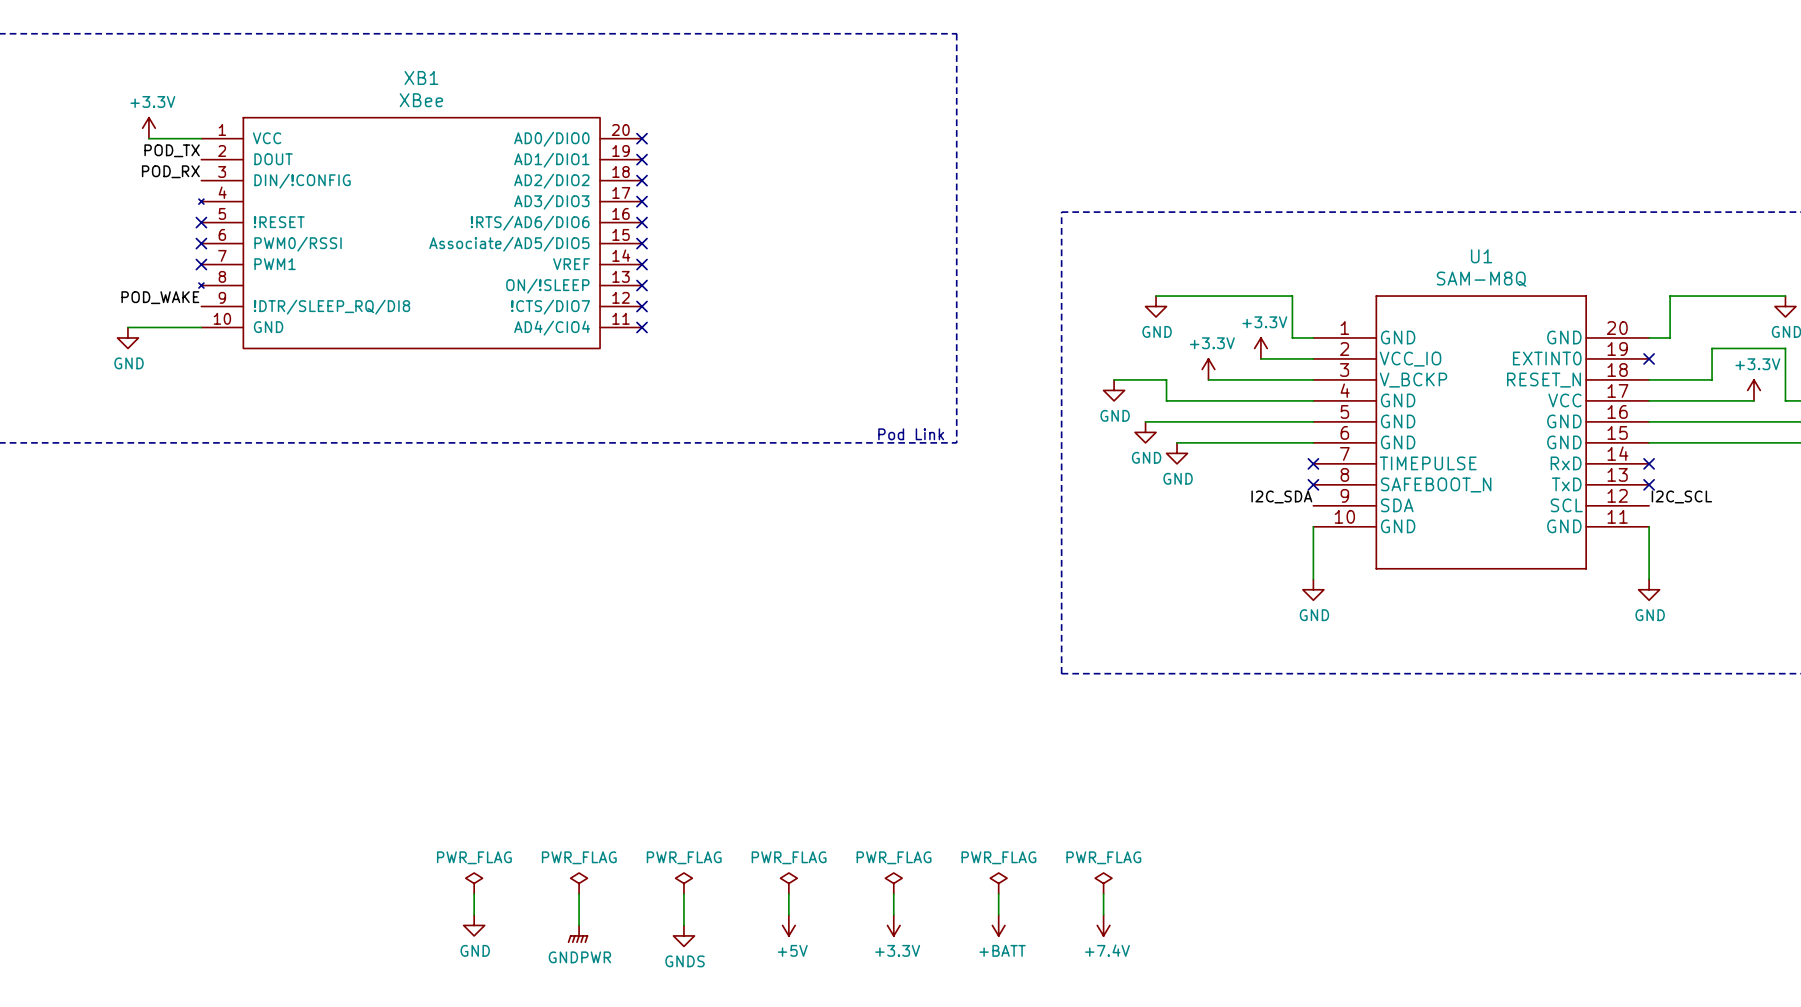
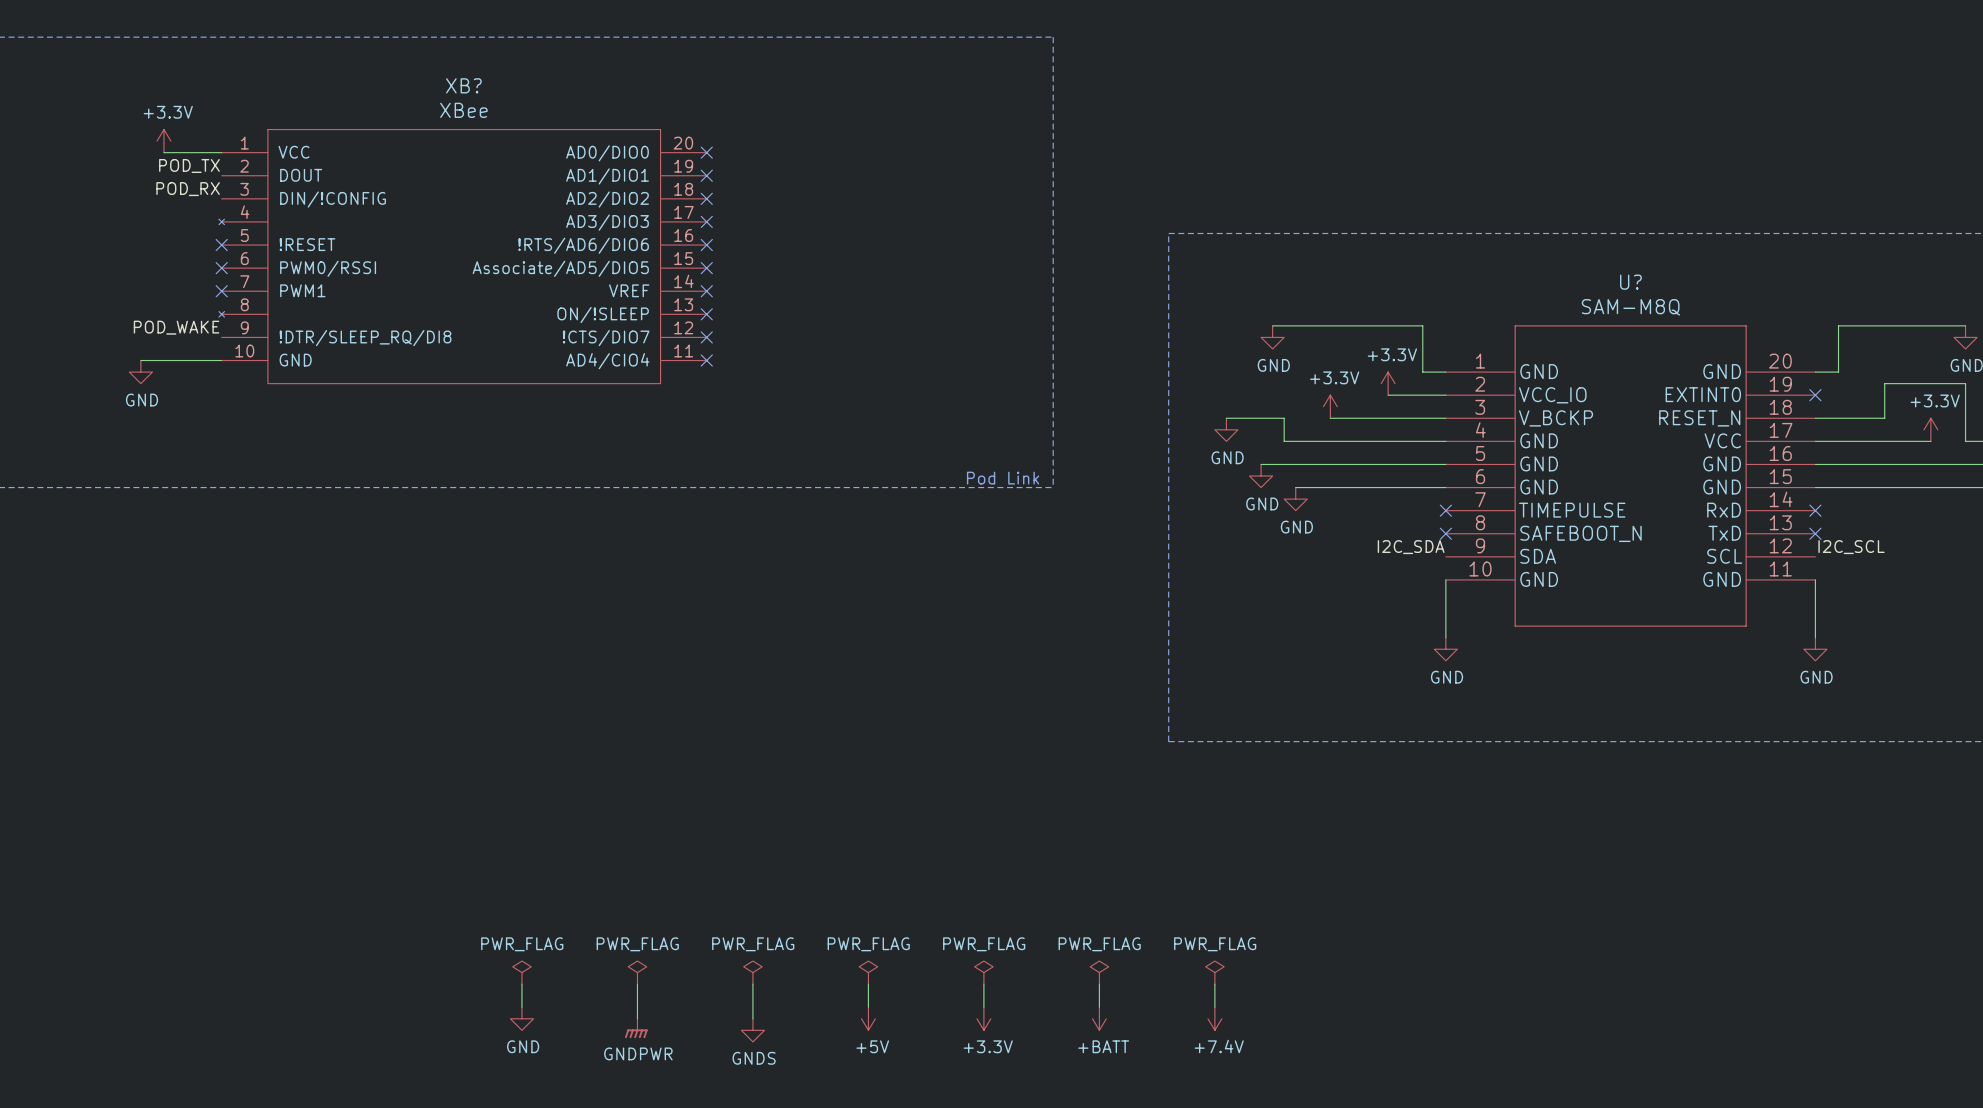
XB1 name: XB1 (421, 77) -> XB? (463, 85)
U1 name: U1 (1481, 256) -> U? (1630, 282)

